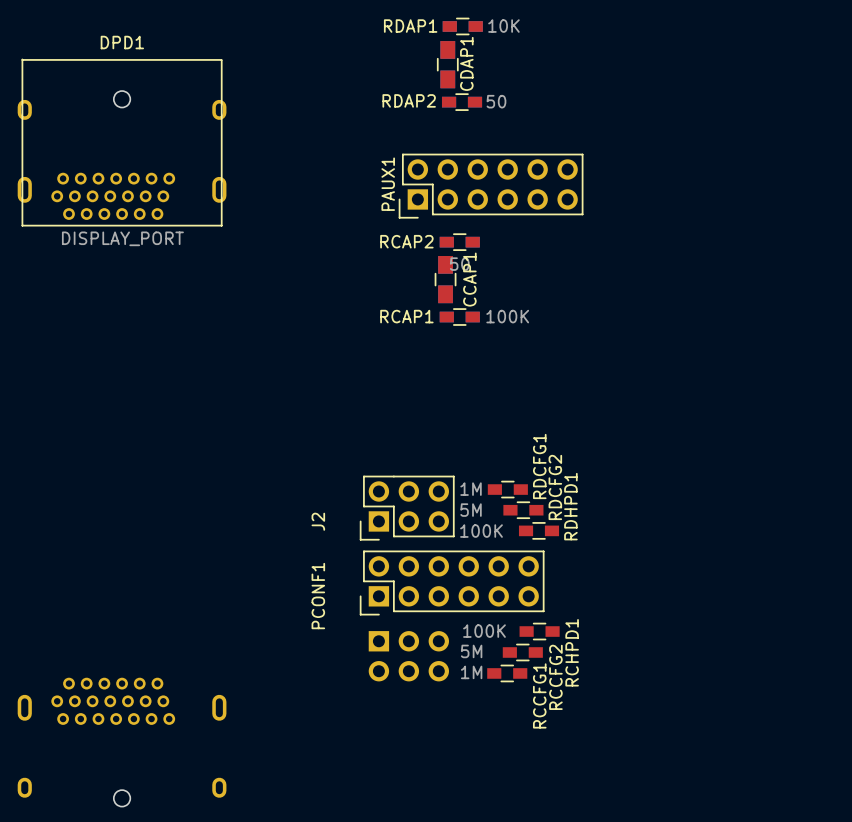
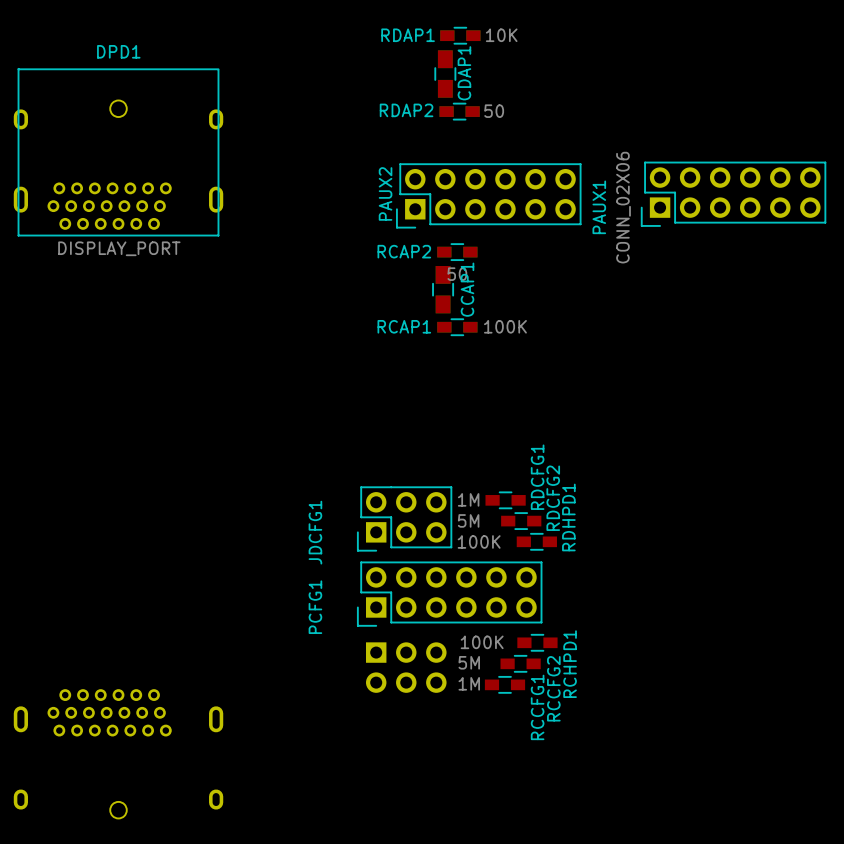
PAUX1 name: PAUX1 (388, 184) -> PAUX2 (385, 193)
PAUX1: none -> CONN_02X06 (733, 194)
J2 name: J2 (318, 521) -> JDCFG1 (315, 532)
PCONF1 name: PCONF1 (318, 596) -> PCFG1 (315, 607)

